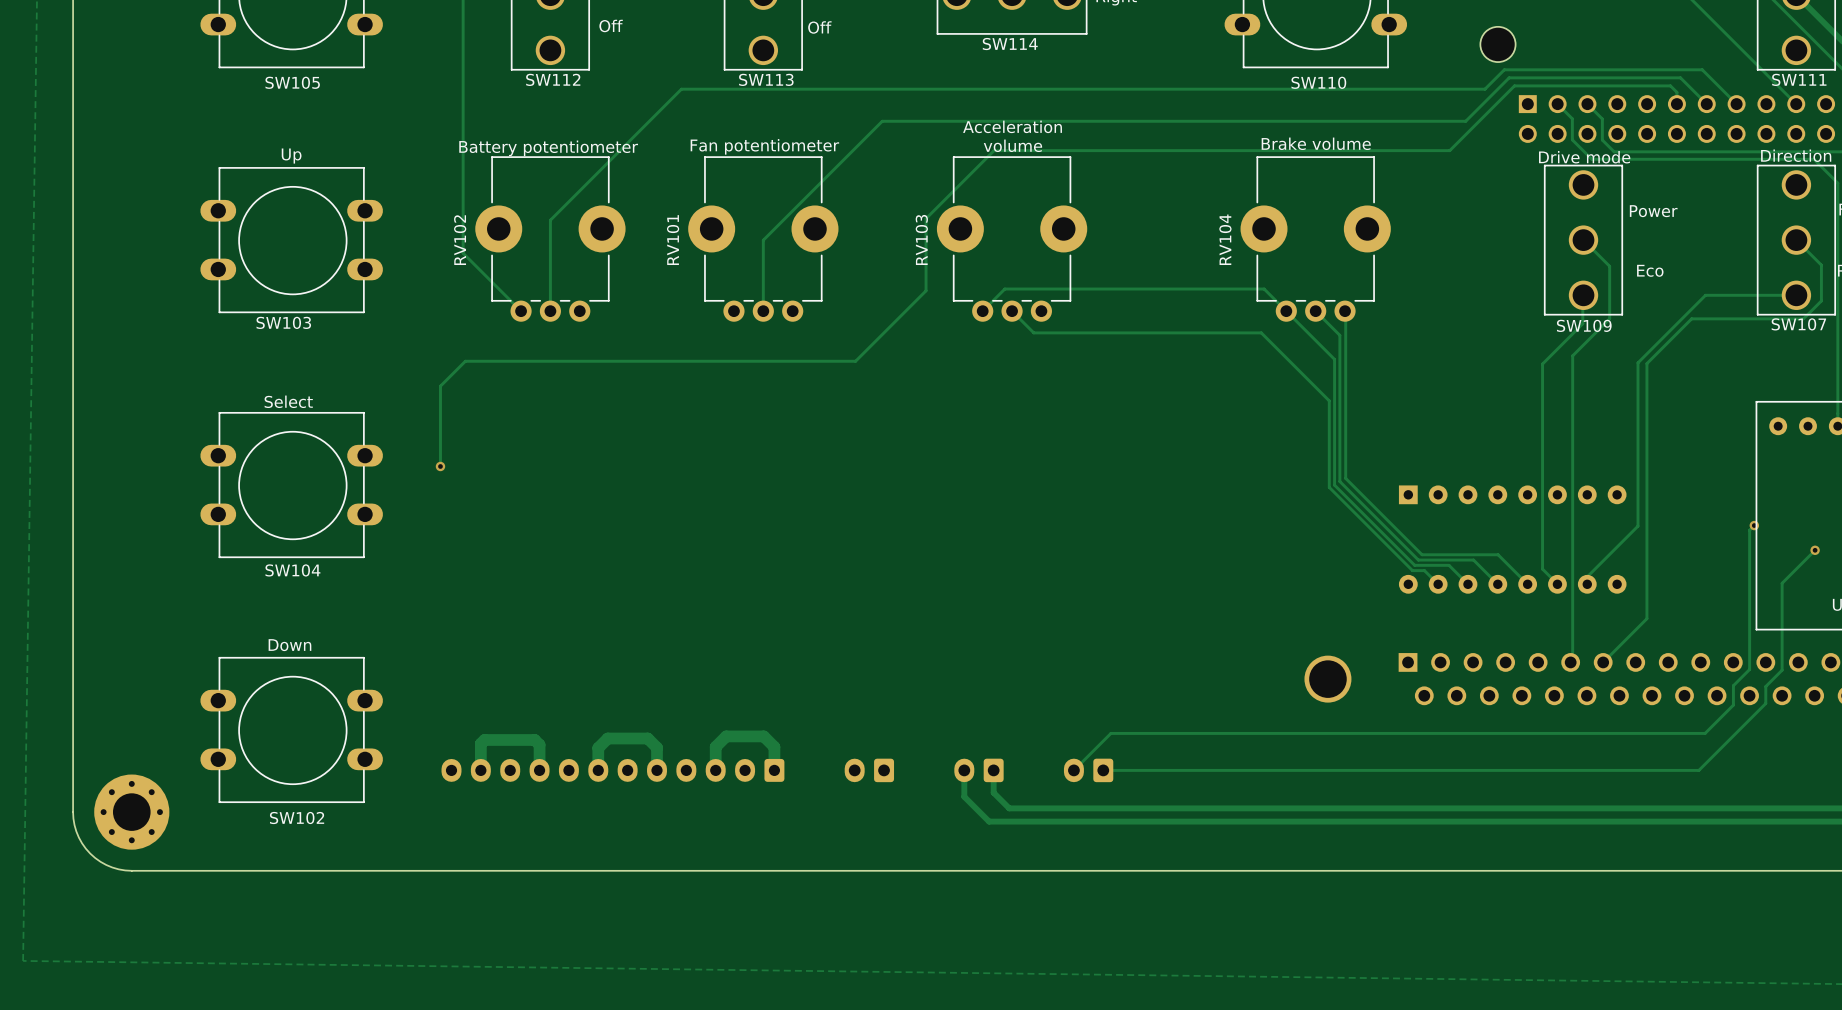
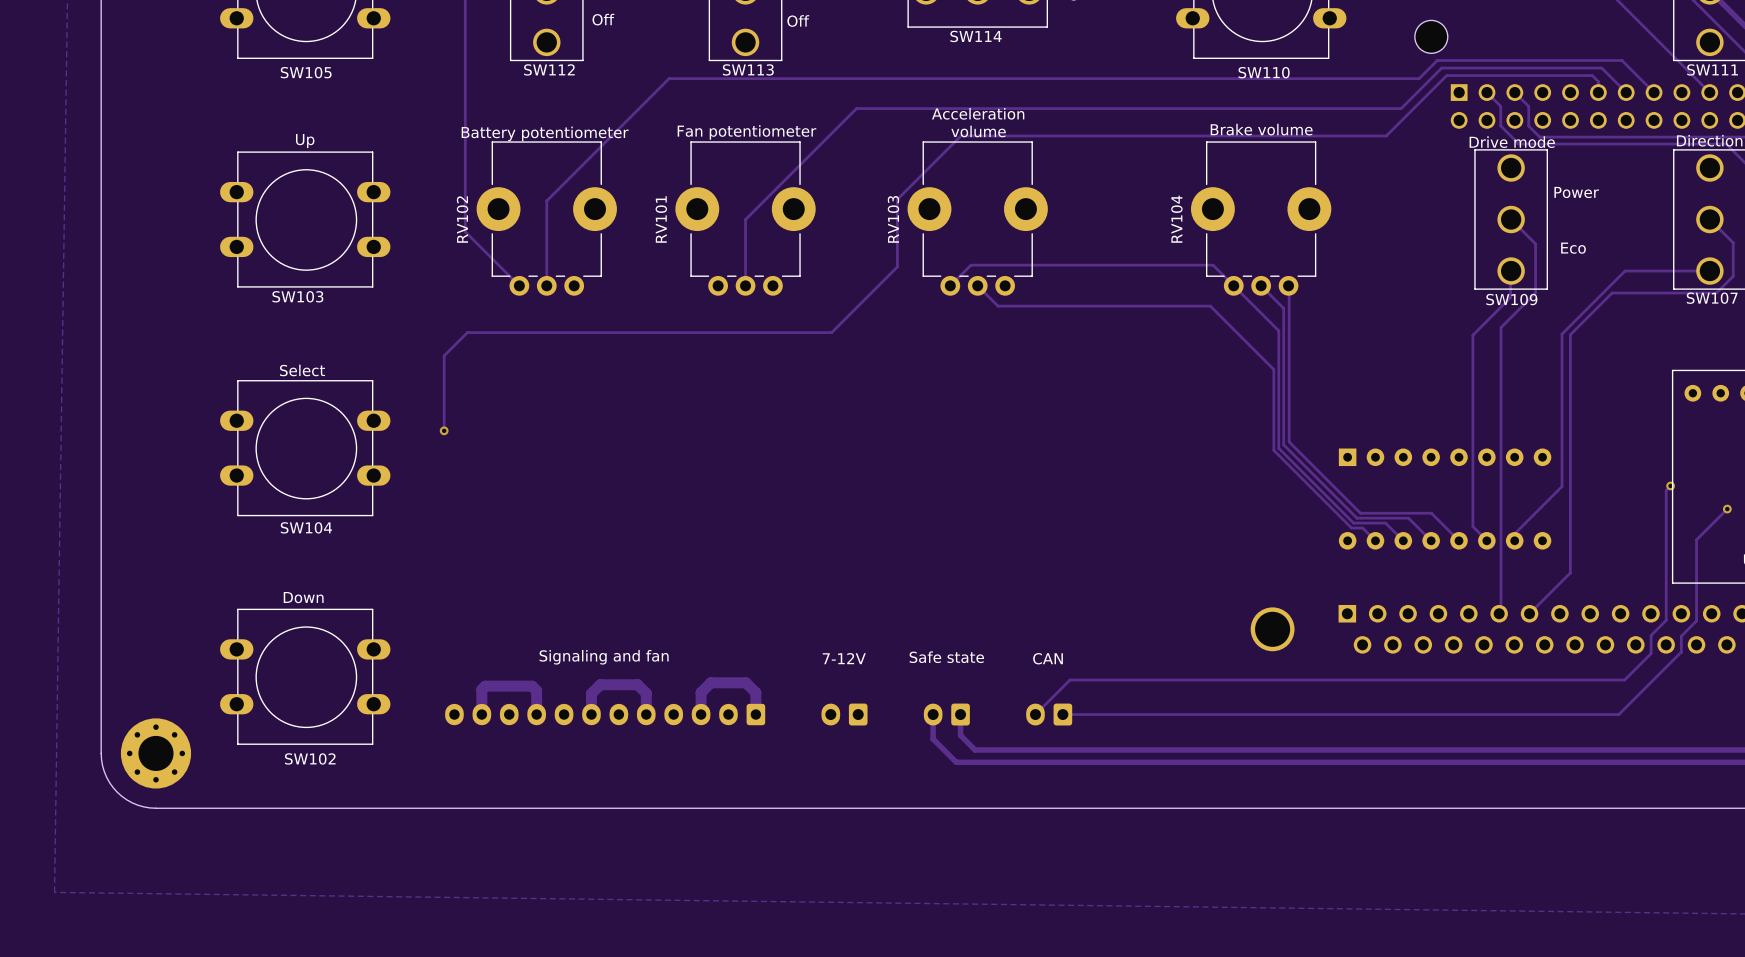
text: none -> Safe state (946, 657)
text: none -> Signaling and fan (604, 657)
text: none -> 7-12V (844, 658)
text: none -> CAN (1048, 658)

